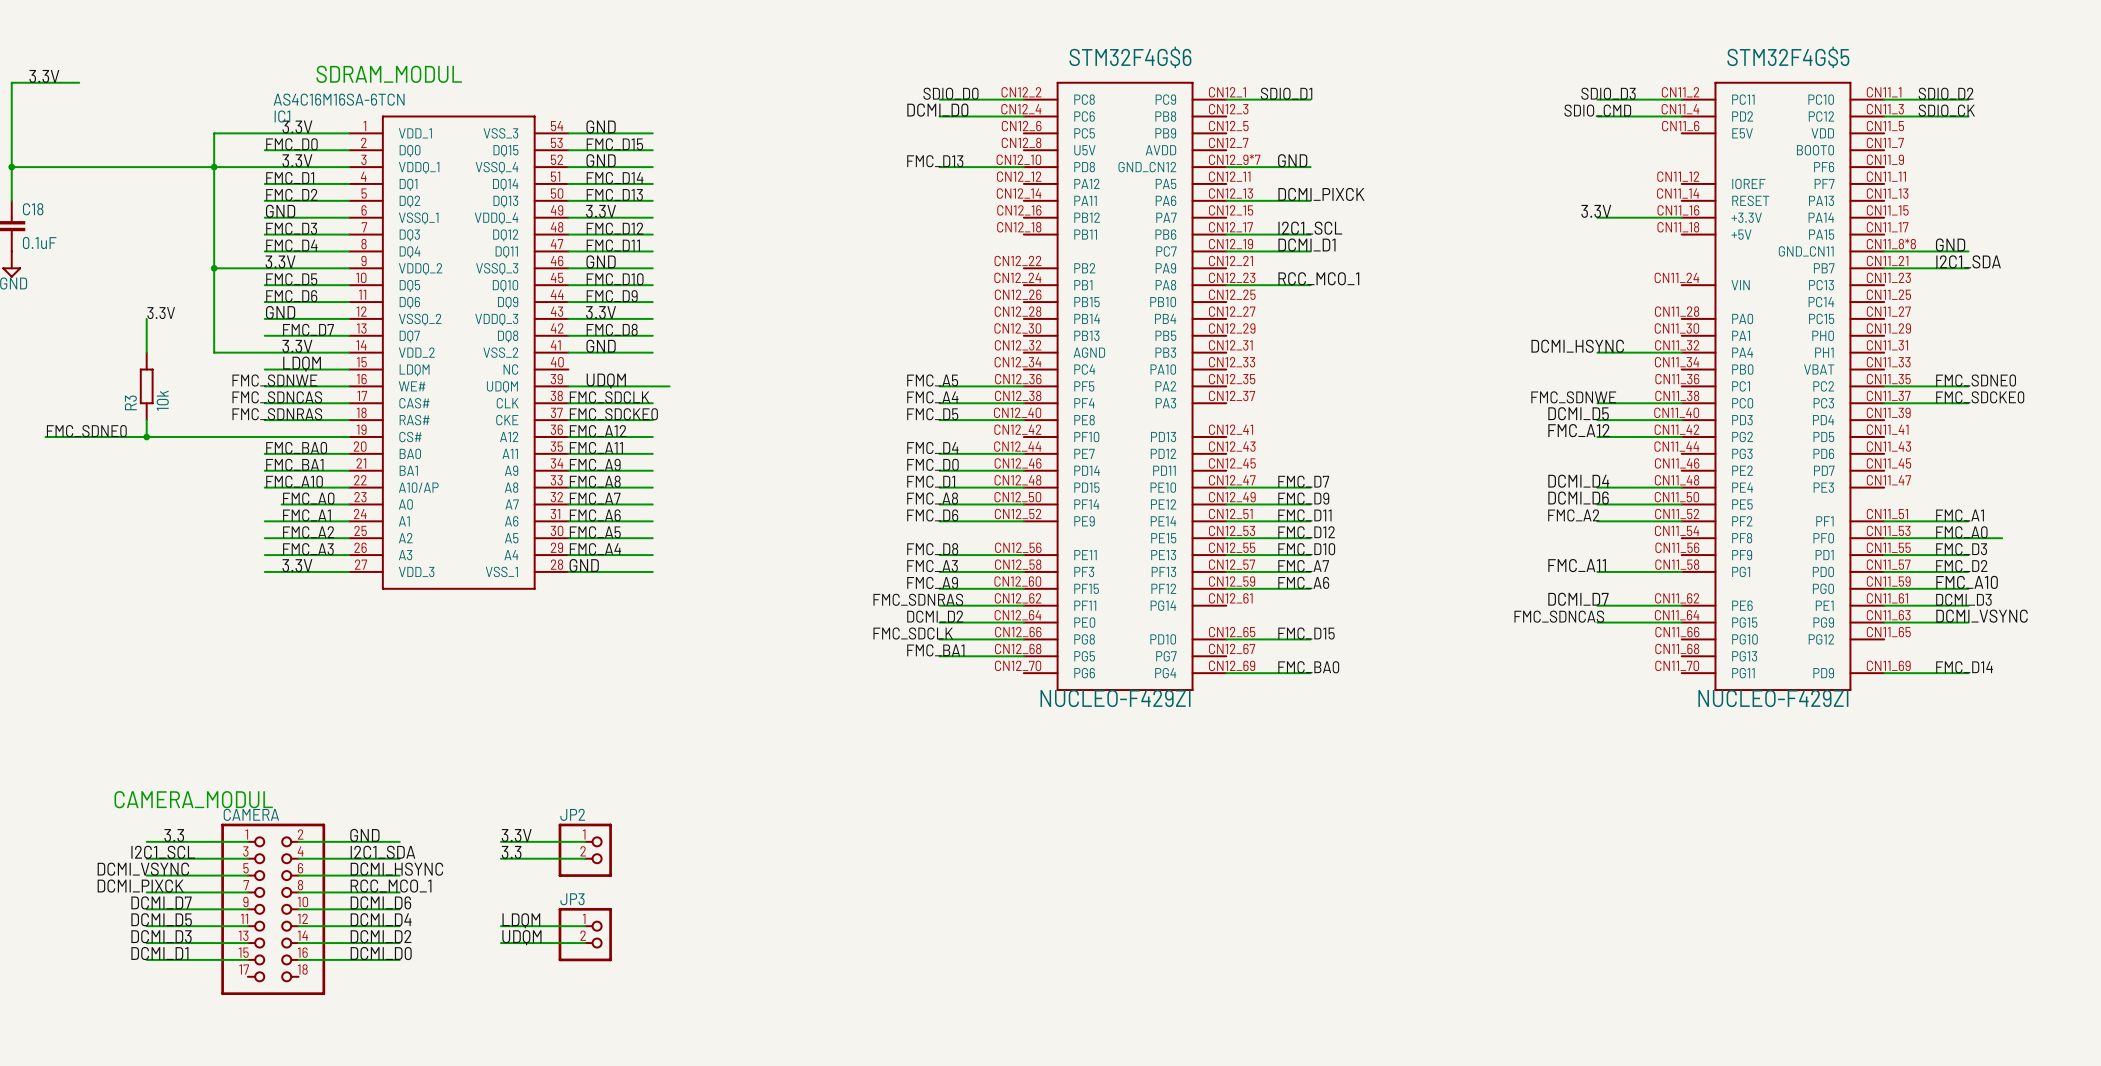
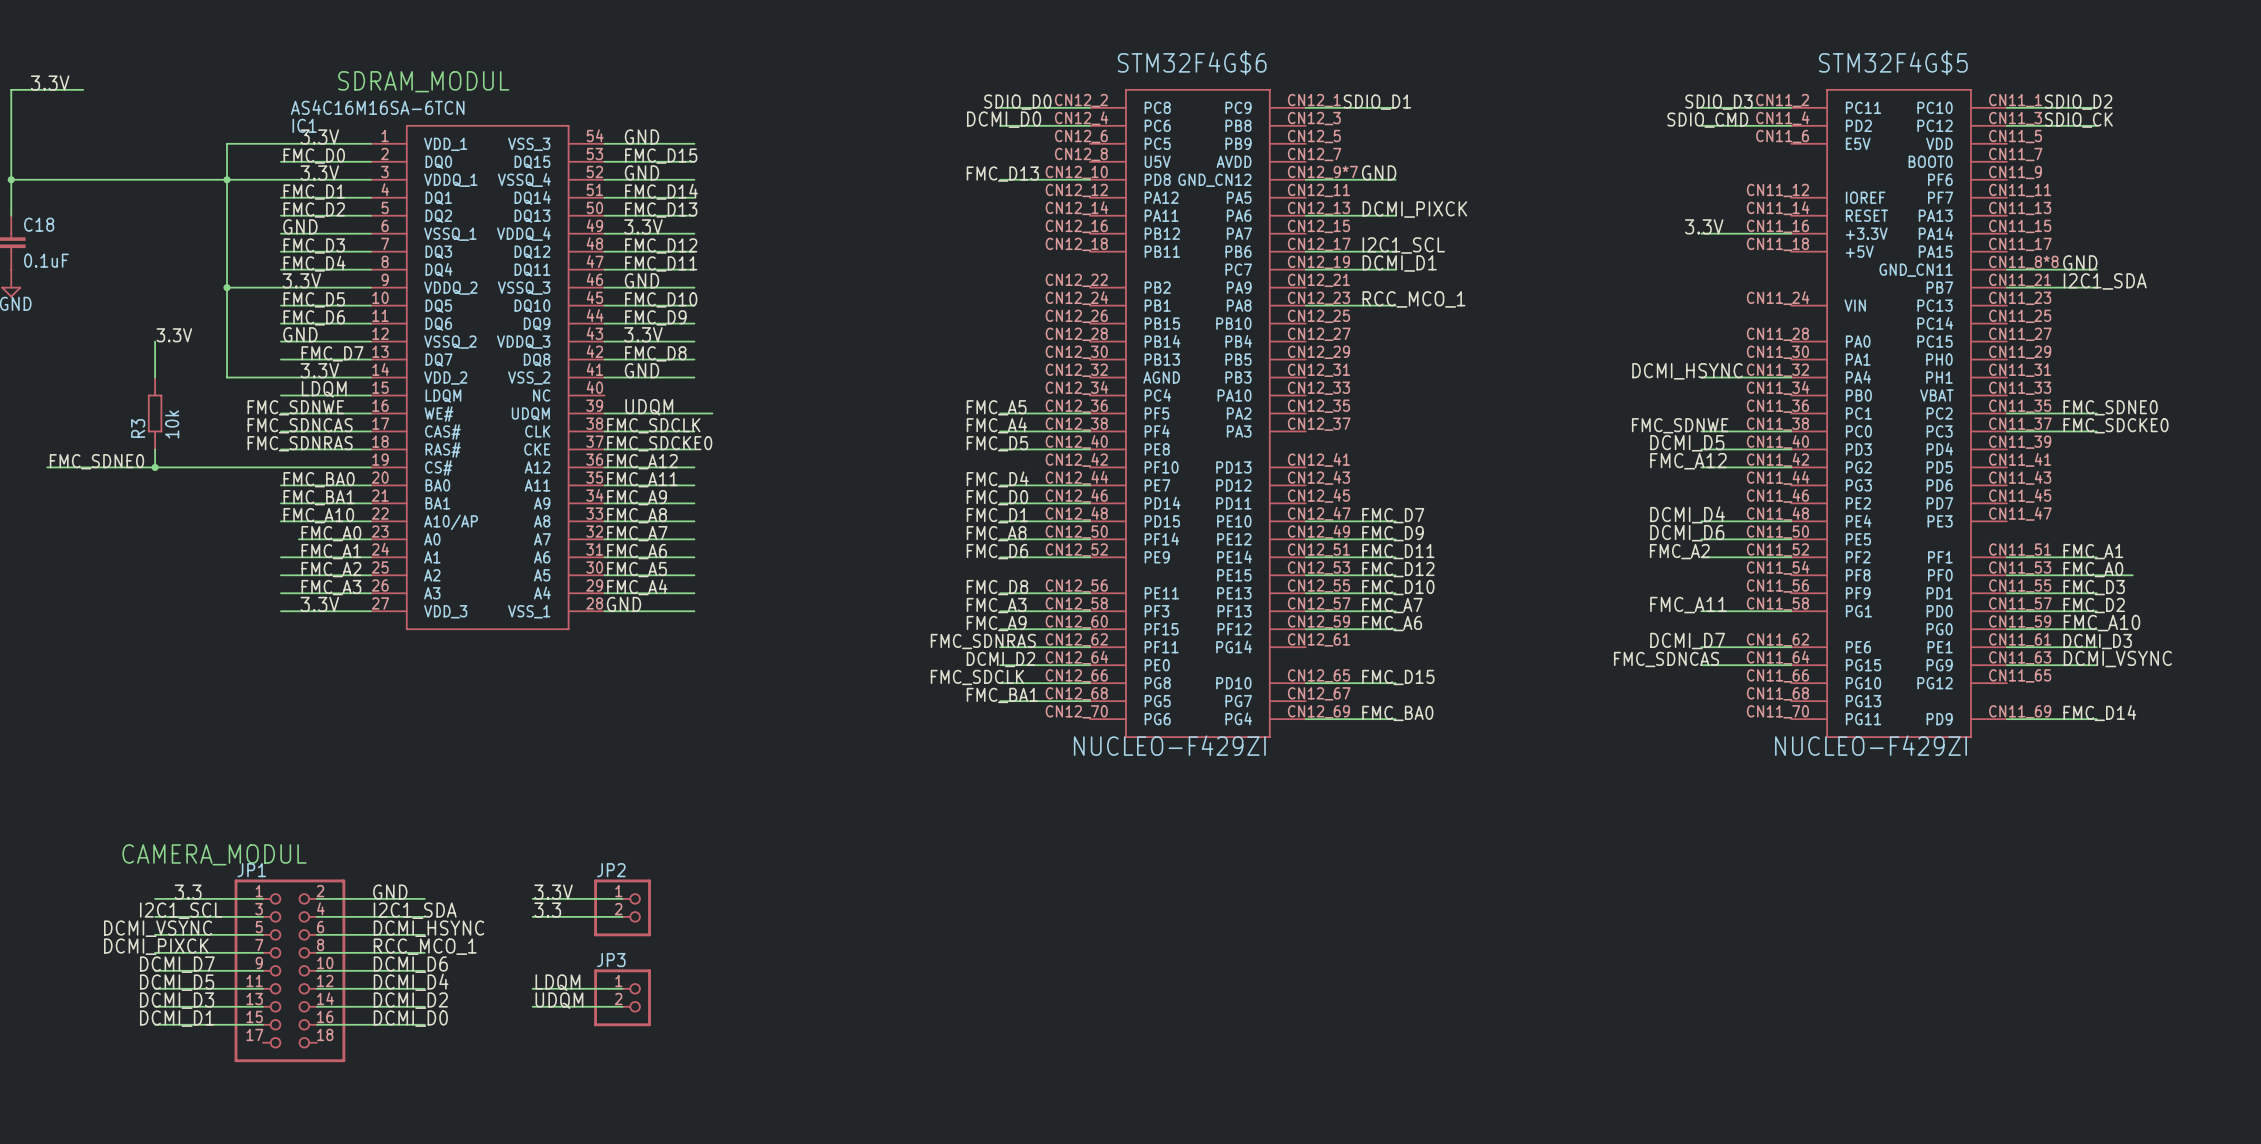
CAMERA name: CAMERA (251, 814) -> JP1 (251, 870)

